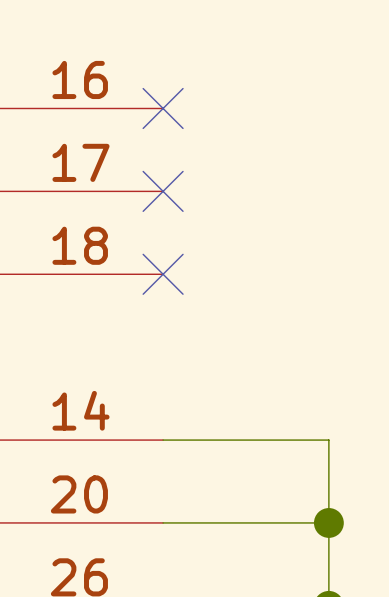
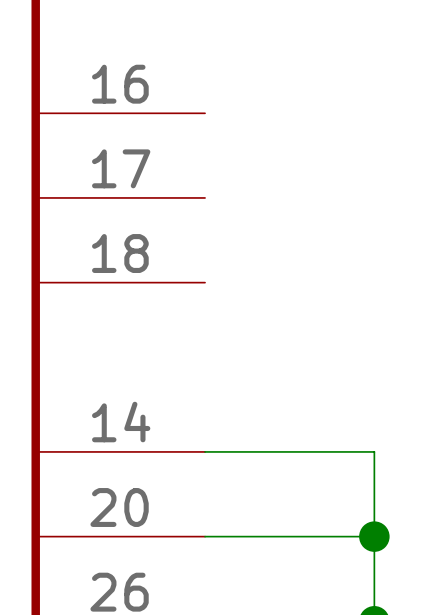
no-connect mark: (163, 108) -> none
no-connect mark: (163, 191) -> none
no-connect mark: (163, 274) -> none

